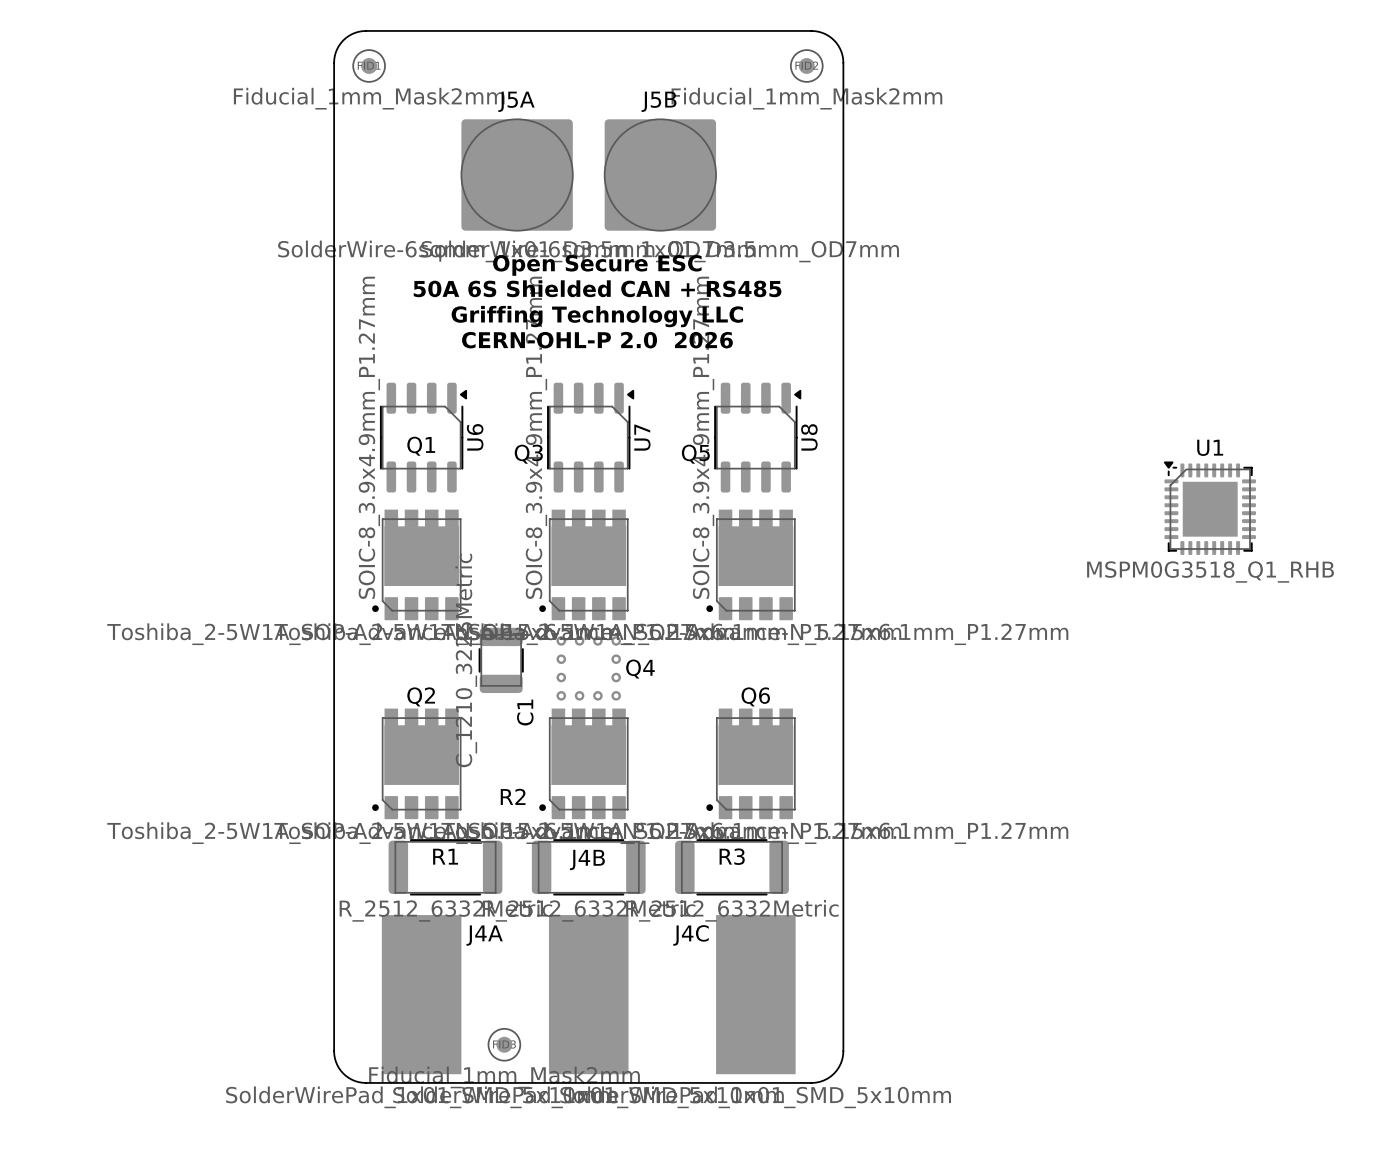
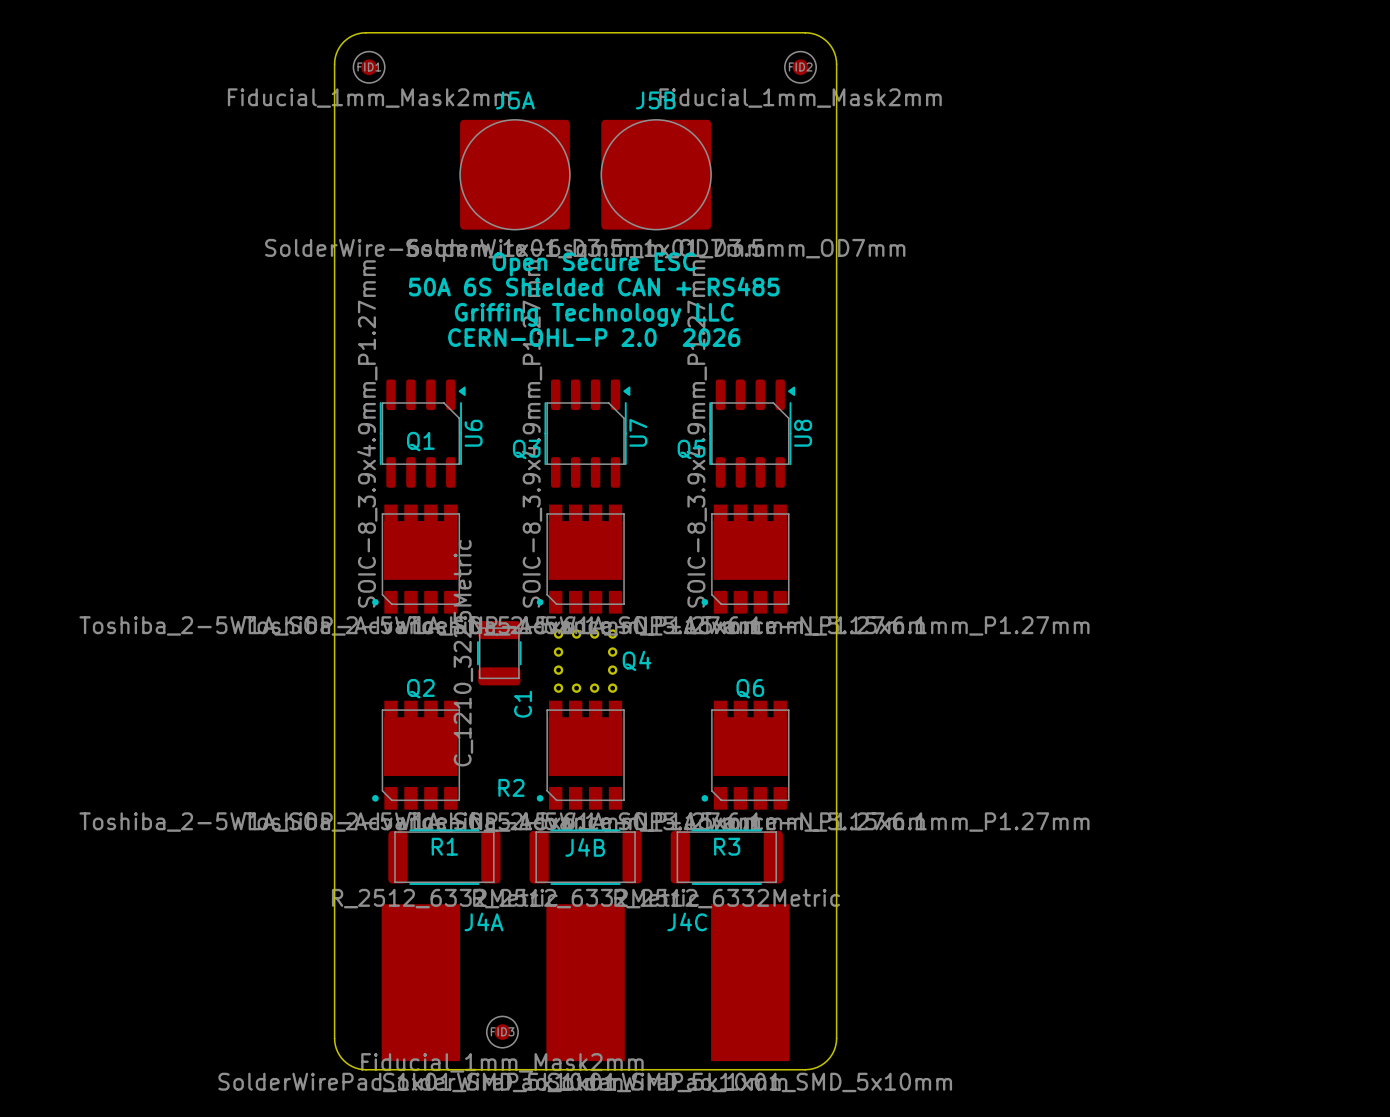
U1: MSPM0G3518_Q1_RHB (1209, 508) -> none

